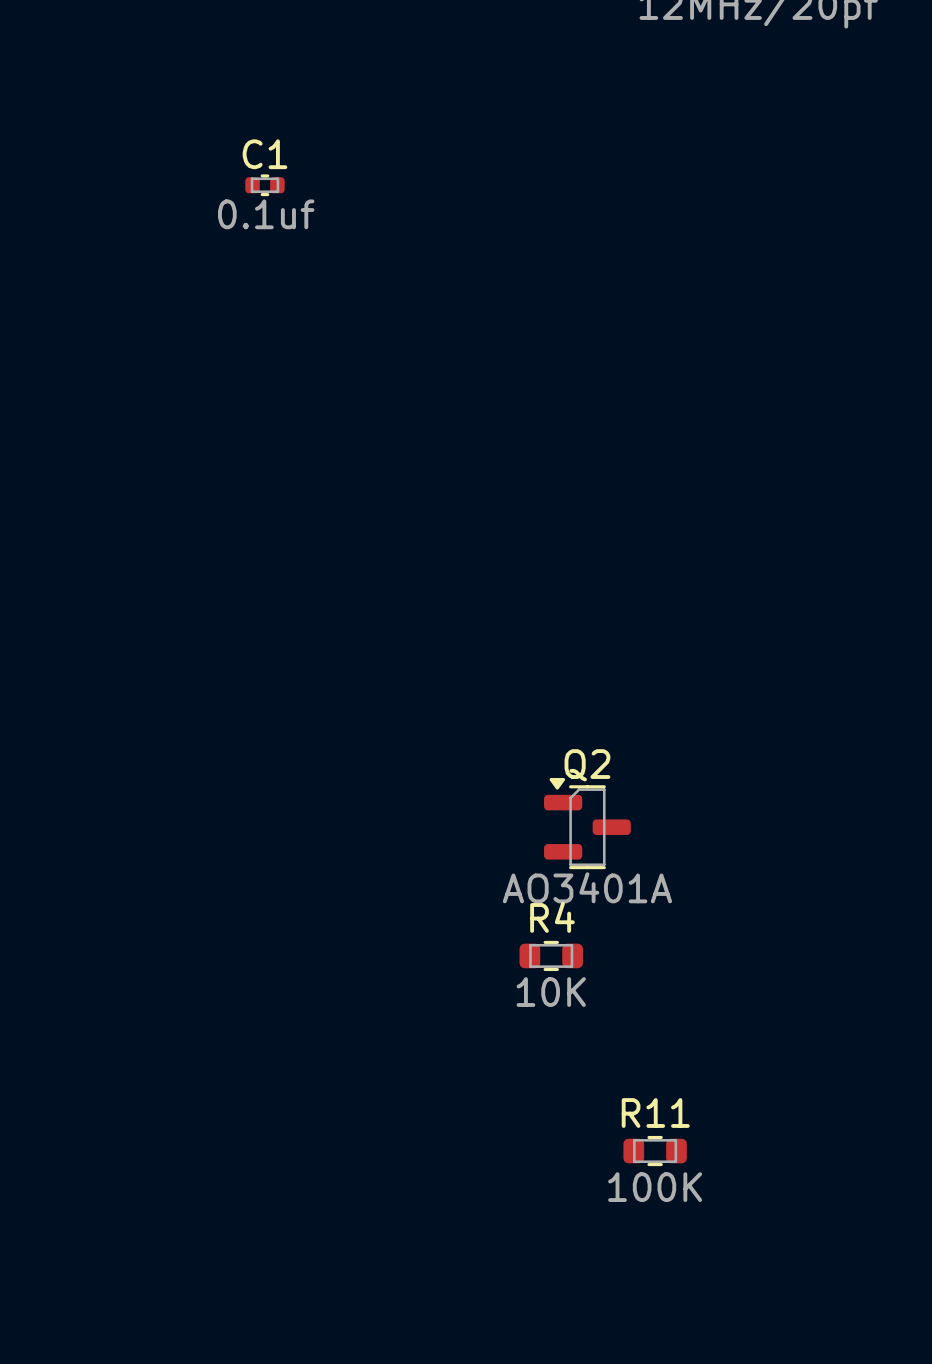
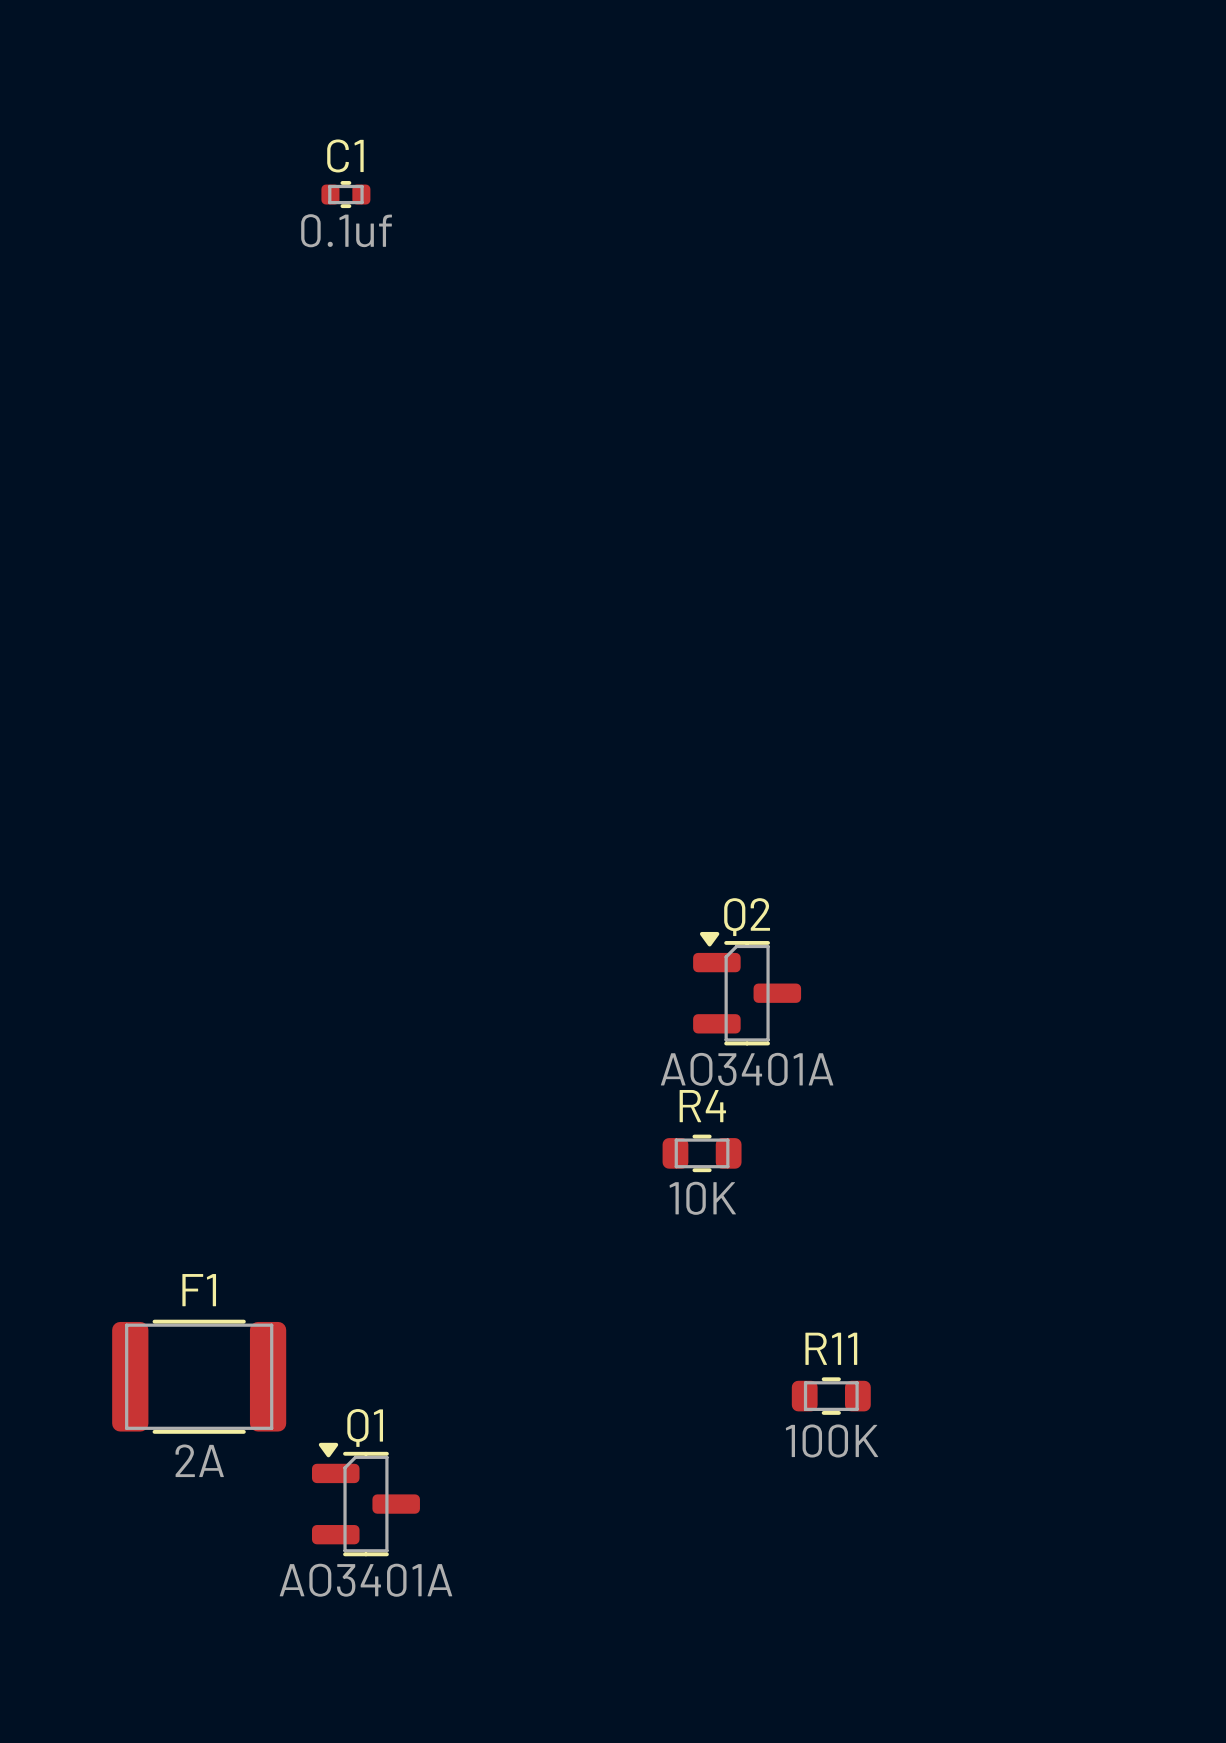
F1: none -> 2A (199, 1376)
Q1: none -> AO3401A (365, 1499)

